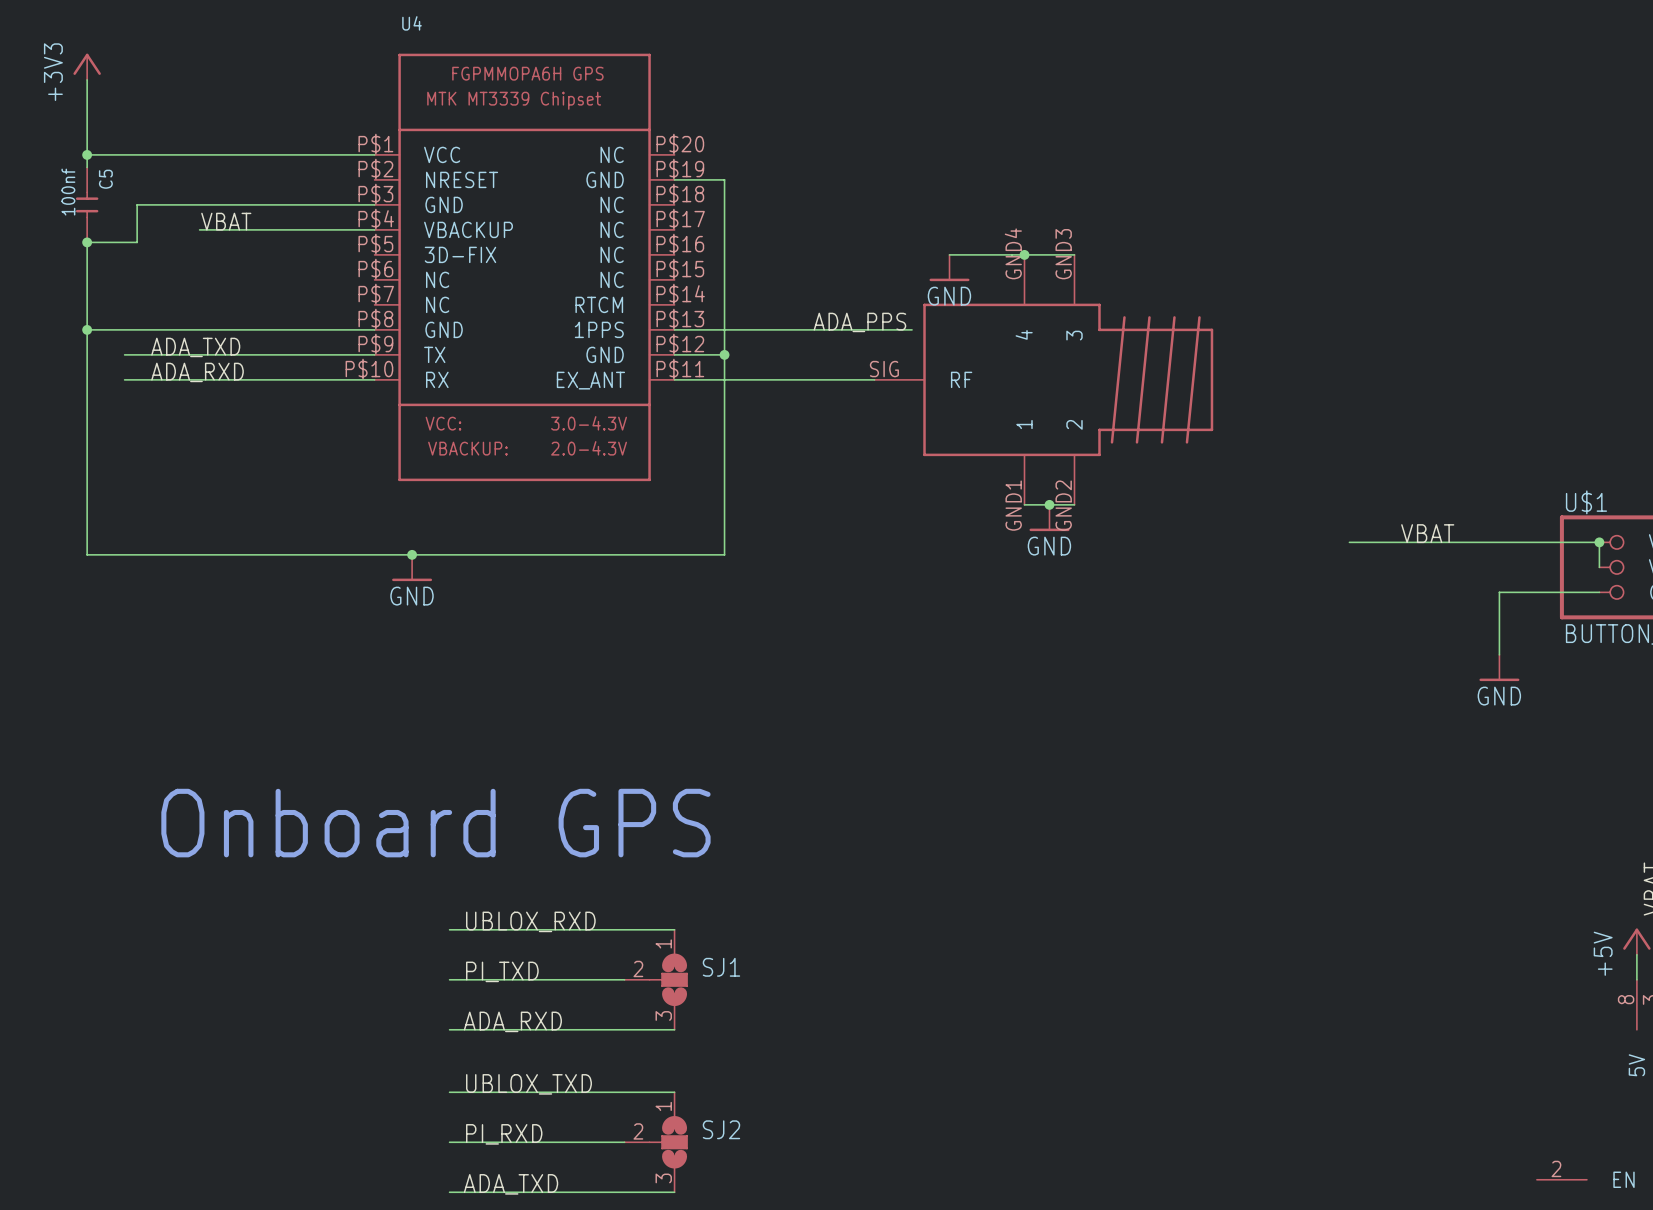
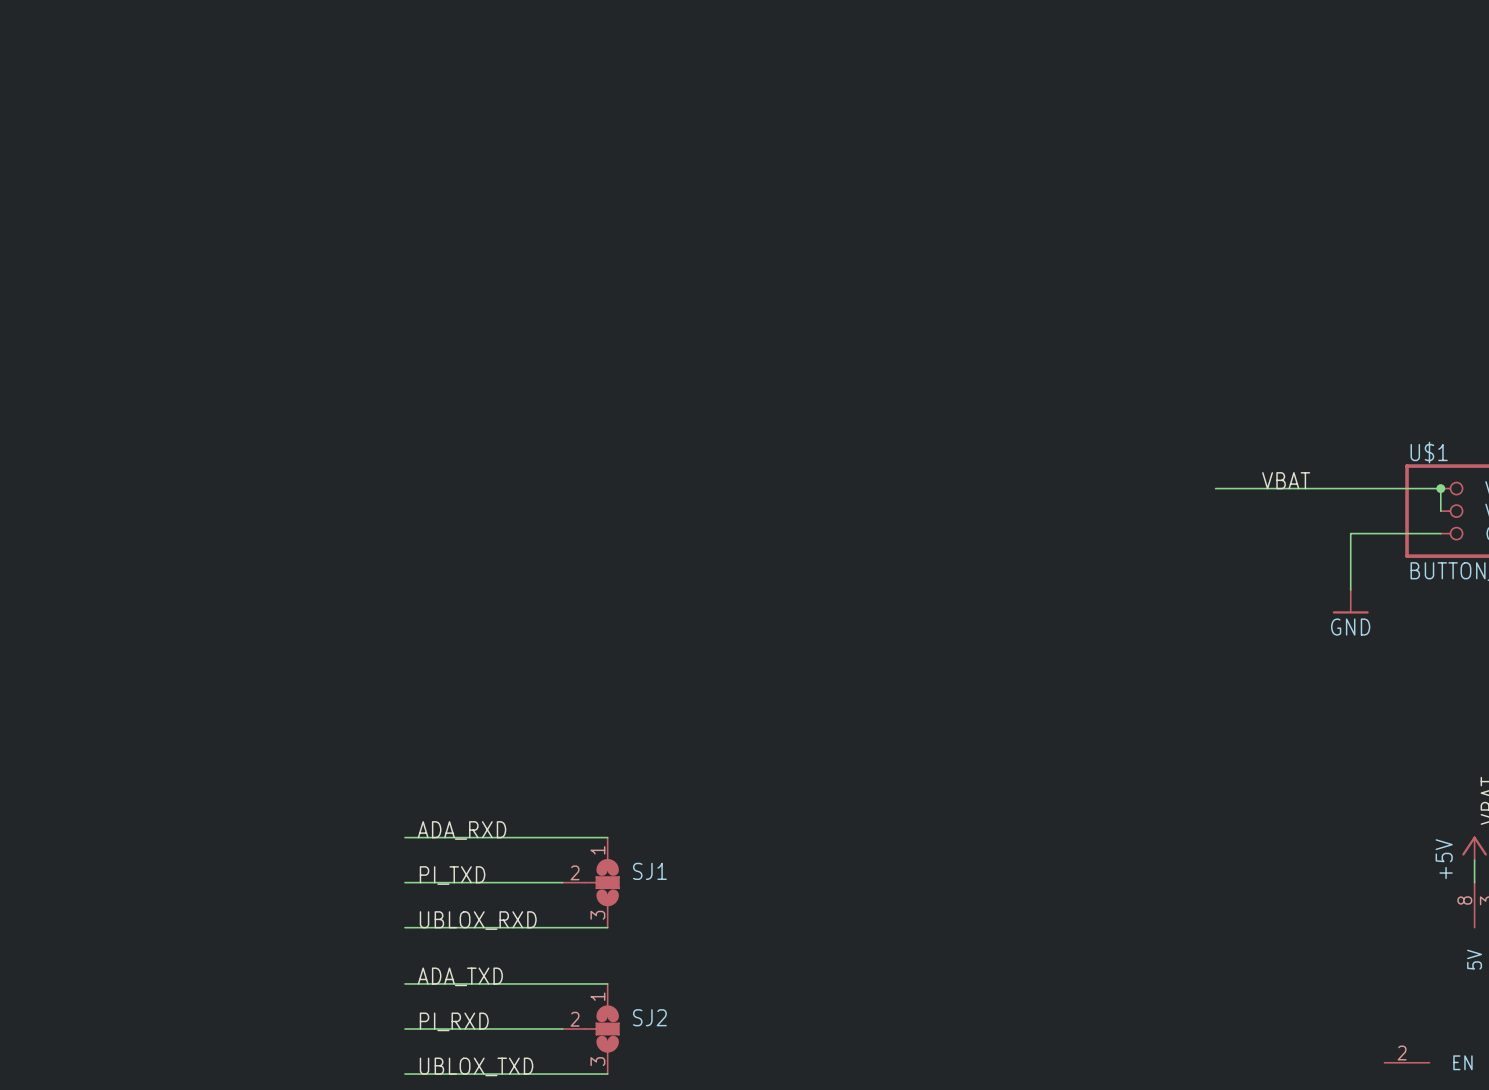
power symbol: +3V3 (87, 66) -> none
wire: (87, 79) (87, 167) -> none
wire: (87, 154) (374, 154) -> none
junction: (87, 154) -> none
wire: (674, 179) (724, 179) (724, 554) (87, 554) (87, 242) (137, 242) (137, 204) (374, 204) -> none
C5: 100nf (87, 204) -> none
label: VBAT (226, 221) -> none
wire: (199, 229) (374, 229) -> none
junction: (87, 242) -> none
wire: (949, 254) (1074, 254) -> none
junction: (1024, 254) -> none
U4: (524, 267) -> none
power symbol: GND (949, 268) -> none
label: ADA_PPS (859, 322) -> none
wire: (87, 329) (374, 329) -> none
junction: (87, 329) -> none
wire: (674, 329) (912, 329) -> none
label: ADA_TXD (195, 347) -> none
wire: (124, 354) (374, 354) -> none
wire: (674, 354) (724, 354) -> none
junction: (724, 354) -> none
label: ADA_RXD (197, 372) -> none
wire: (124, 379) (374, 379) -> none
wire: (674, 379) (874, 379) -> none
part: (1043, 379) -> none
wire: (1024, 504) (1074, 504) -> none
junction: (1049, 504) -> none
power symbol: GND (1049, 517) -> none
junction: (412, 554) -> none
power symbol: GND (412, 567) -> none
text: Onboard GPS (435, 823) -> none
label: UBLOX_RXD (530, 921) -> ADA_RXD (462, 830)
label: ADA_RXD (512, 1021) -> UBLOX_RXD (478, 920)
label: UBLOX_TXD (528, 1084) -> ADA_TXD (460, 976)
label: ADA_TXD (510, 1184) -> UBLOX_TXD (476, 1066)

